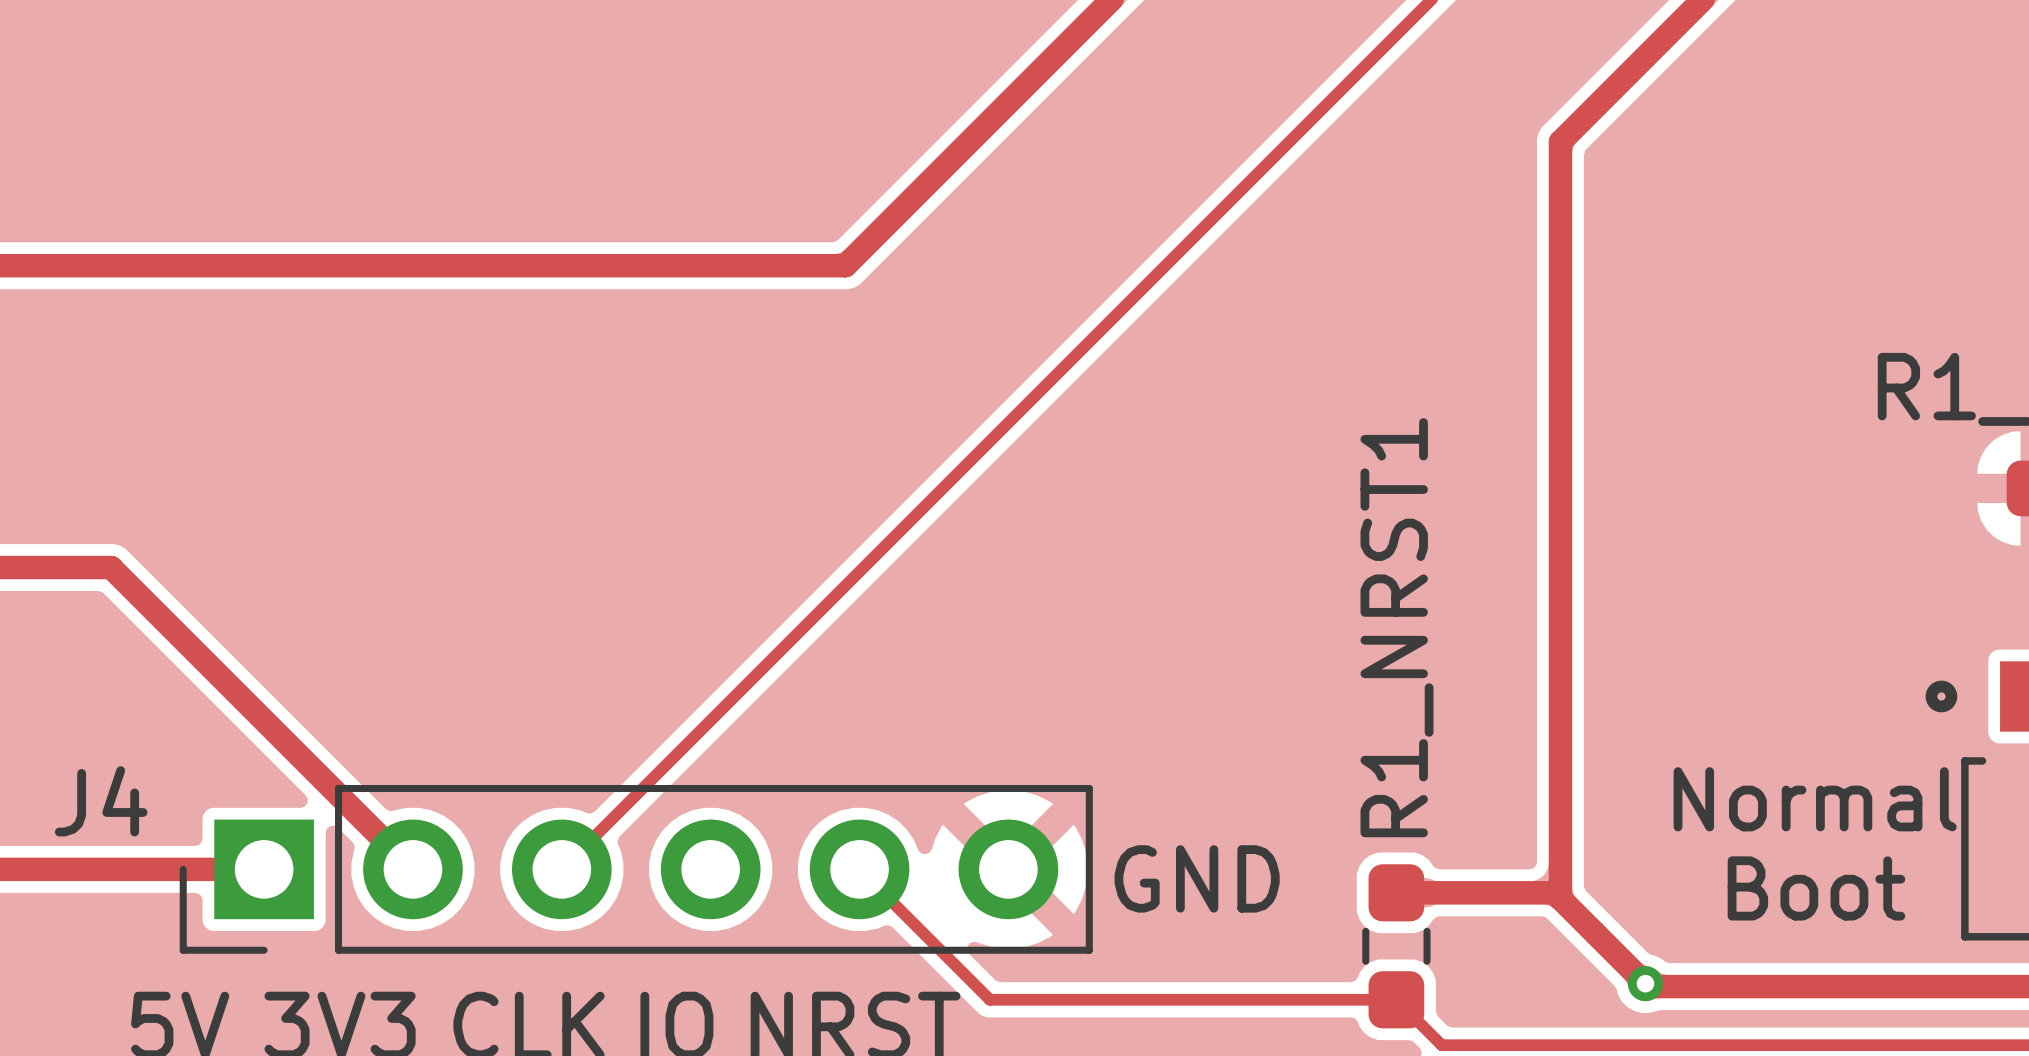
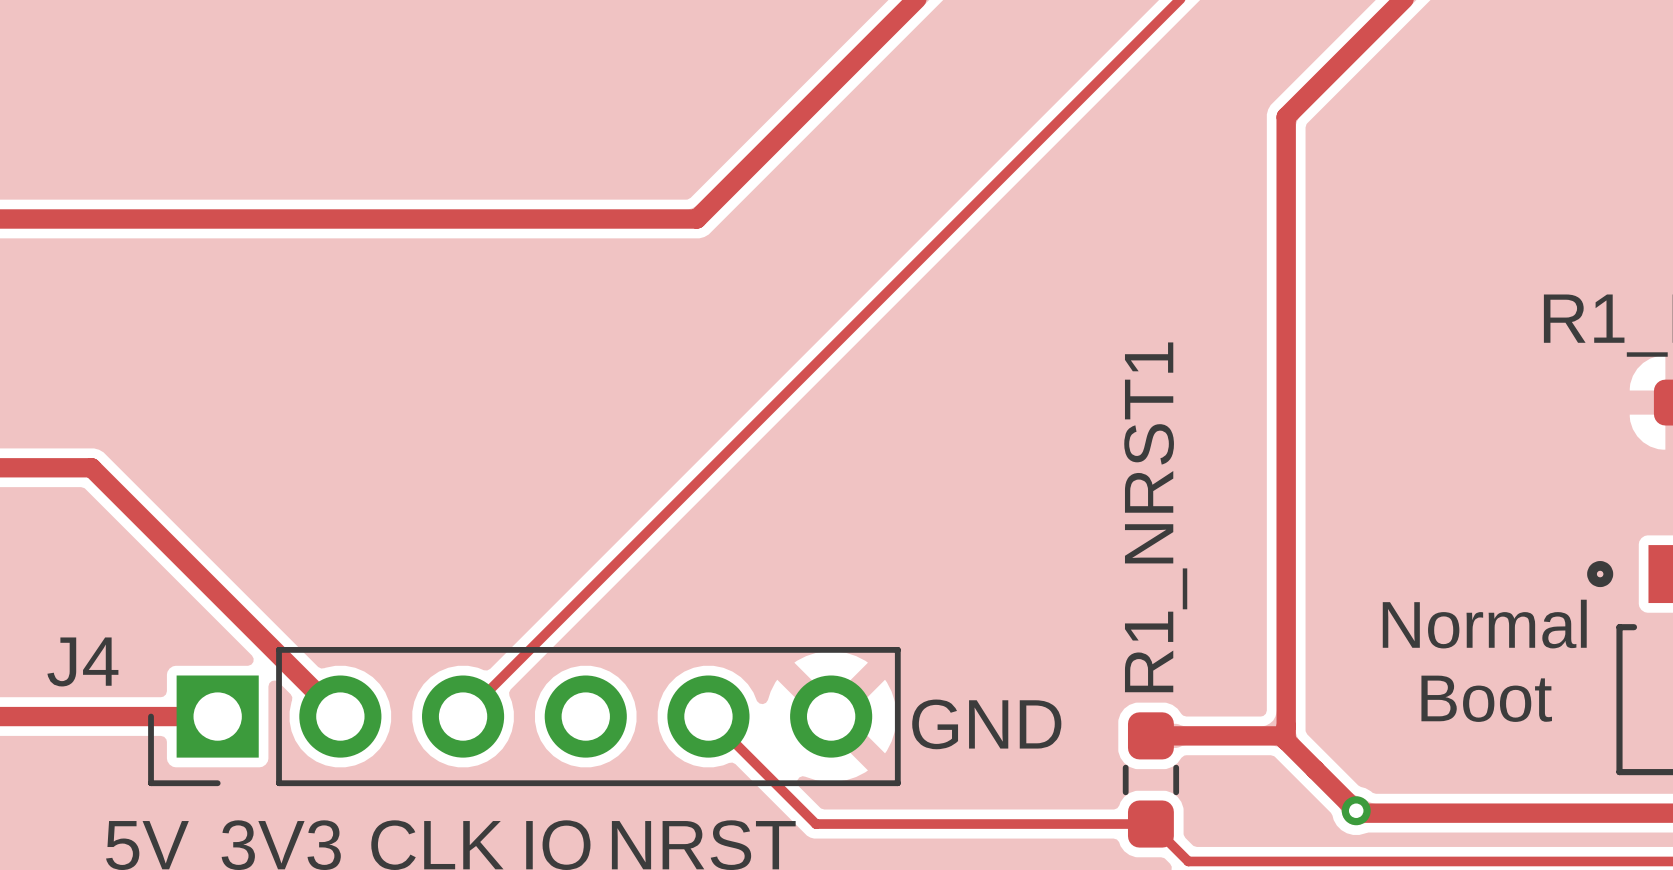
text position: Normal (1815, 799) -> Normal (1484, 624)
text position: Boot (1816, 888) -> Boot (1486, 698)

